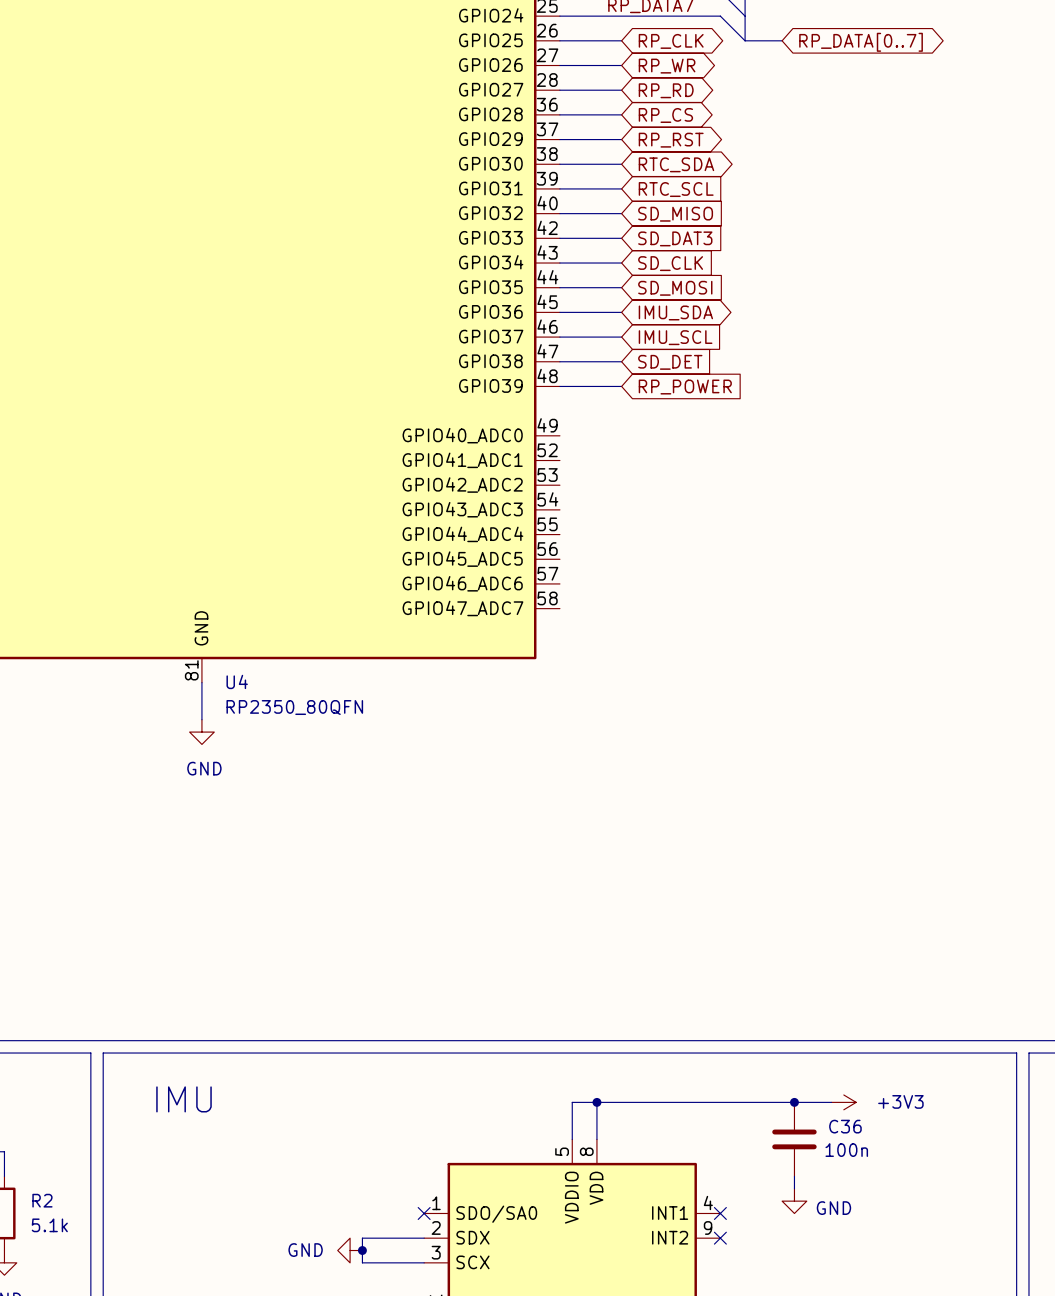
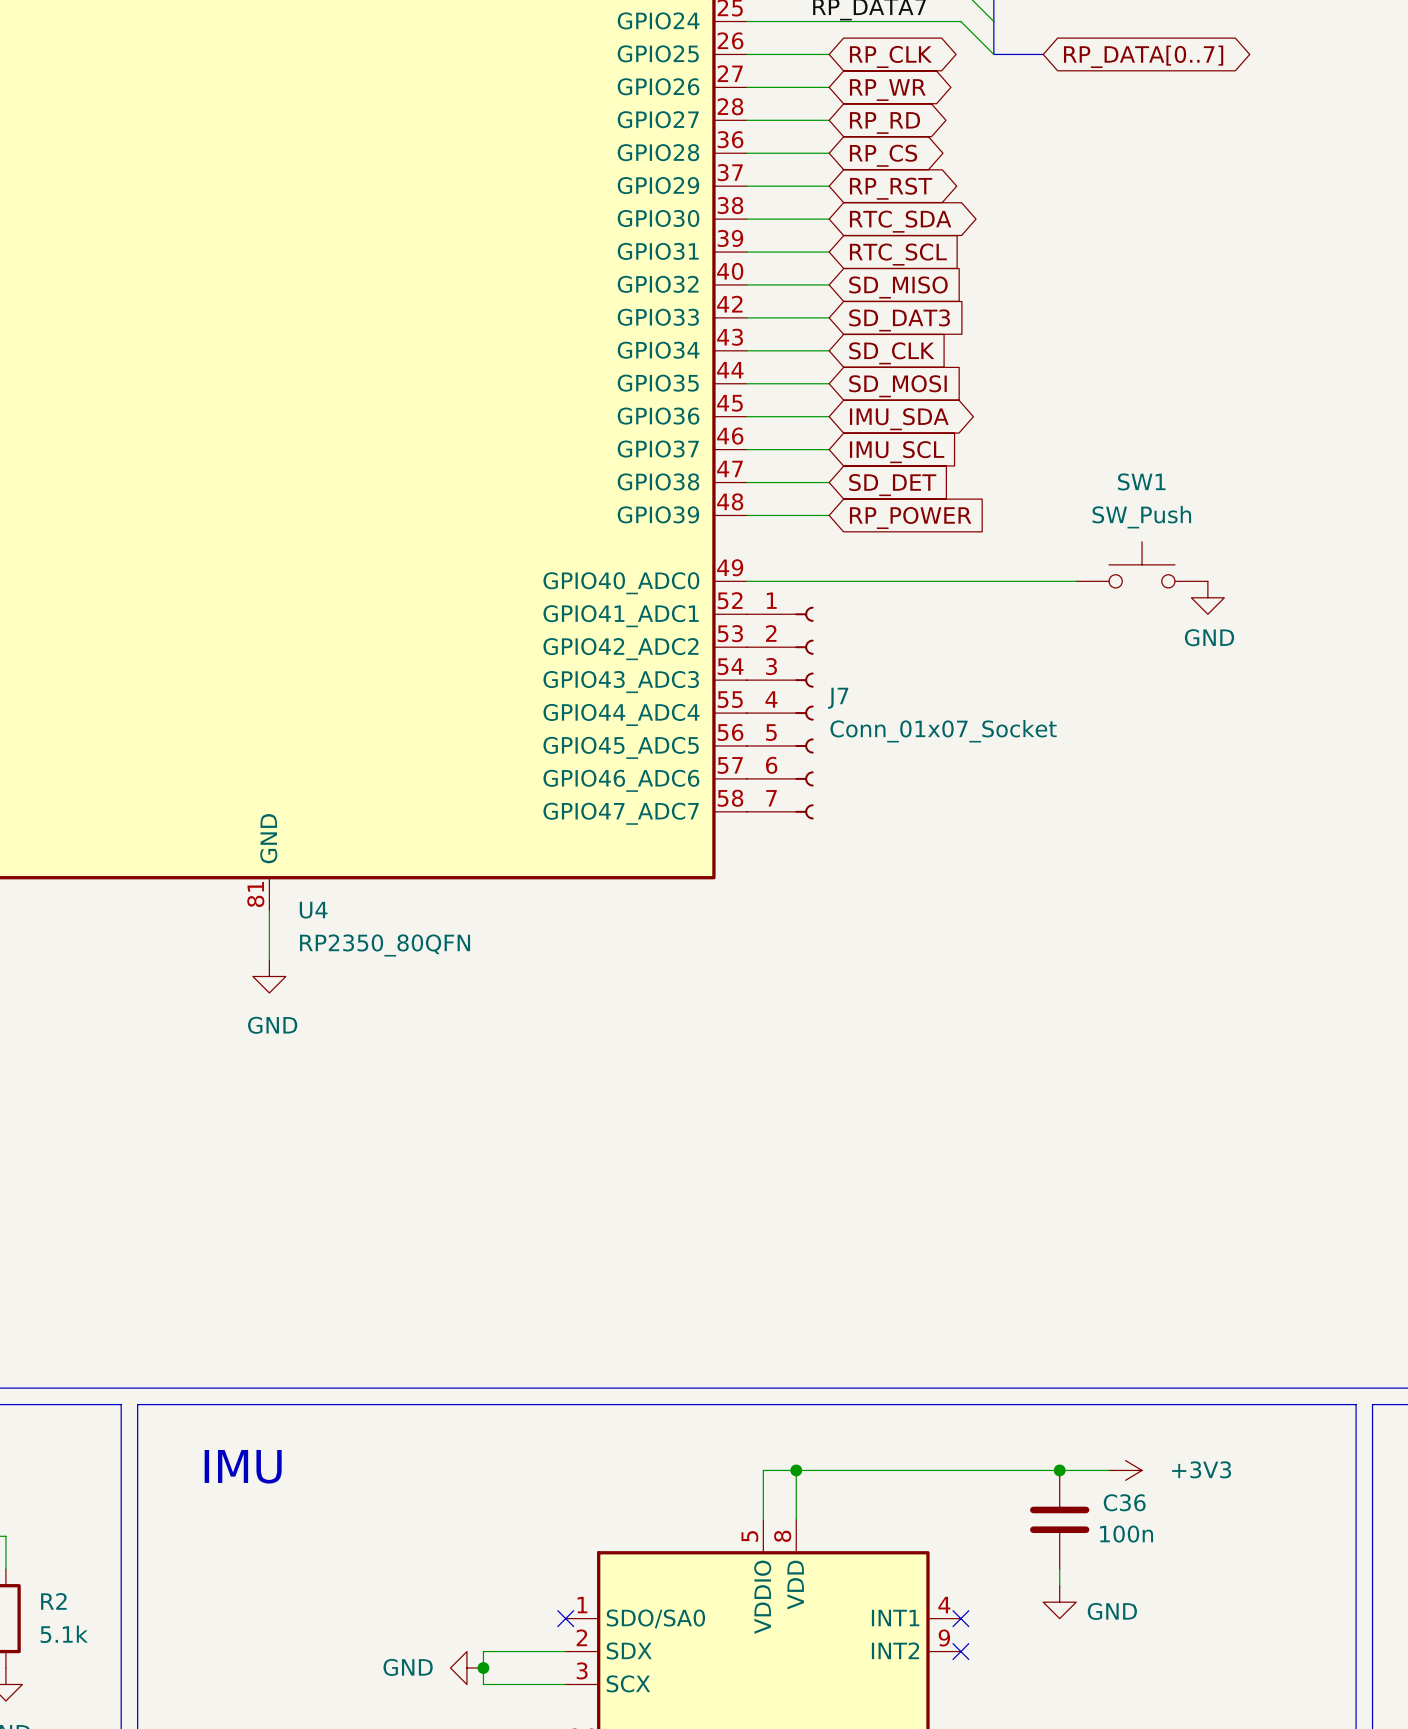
SW1: none -> SW_Push (1142, 564)
wire: none -> (746, 581) (1076, 581)
power symbol: none -> GND (1207, 597)
J7: none -> Conn_01x07_Socket (780, 713)

